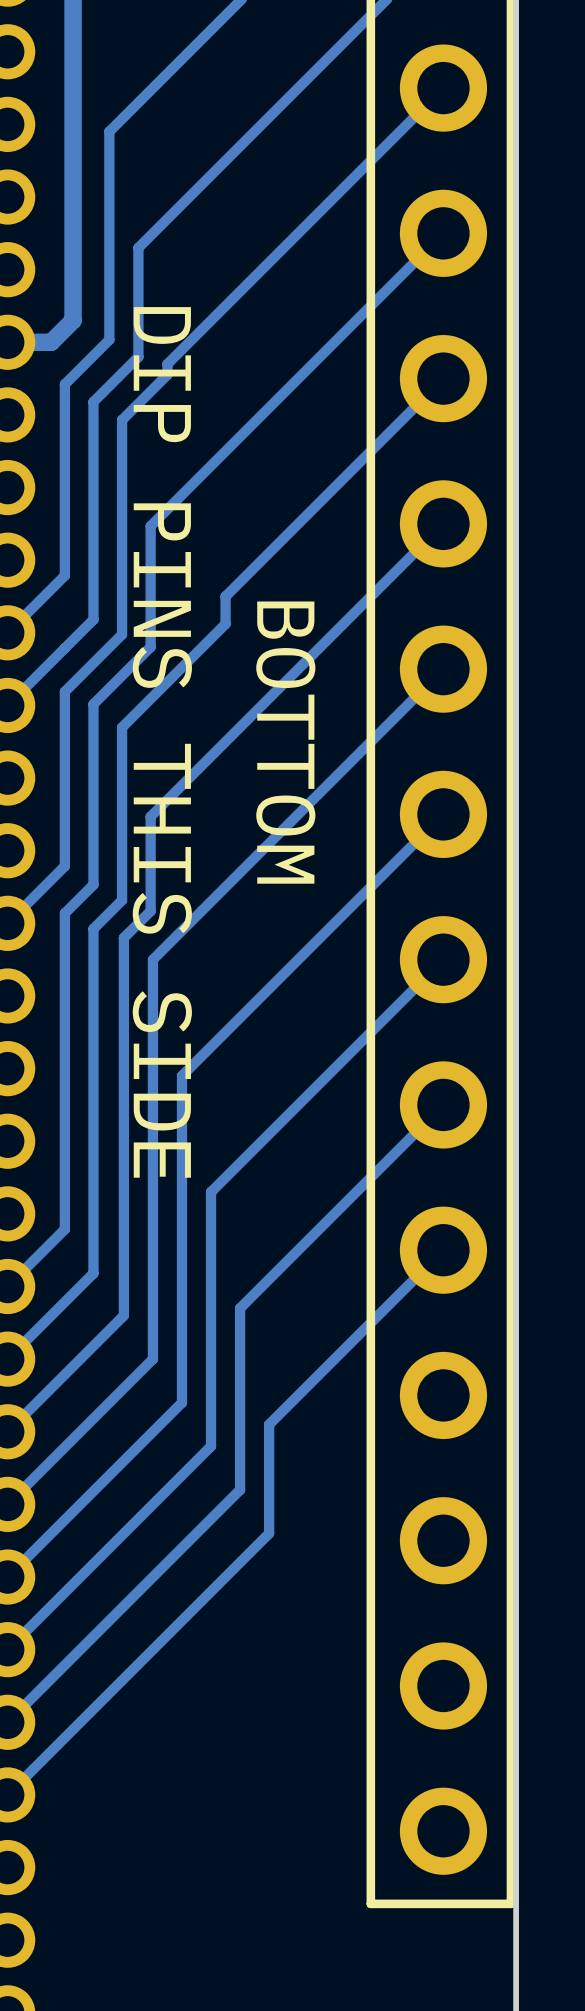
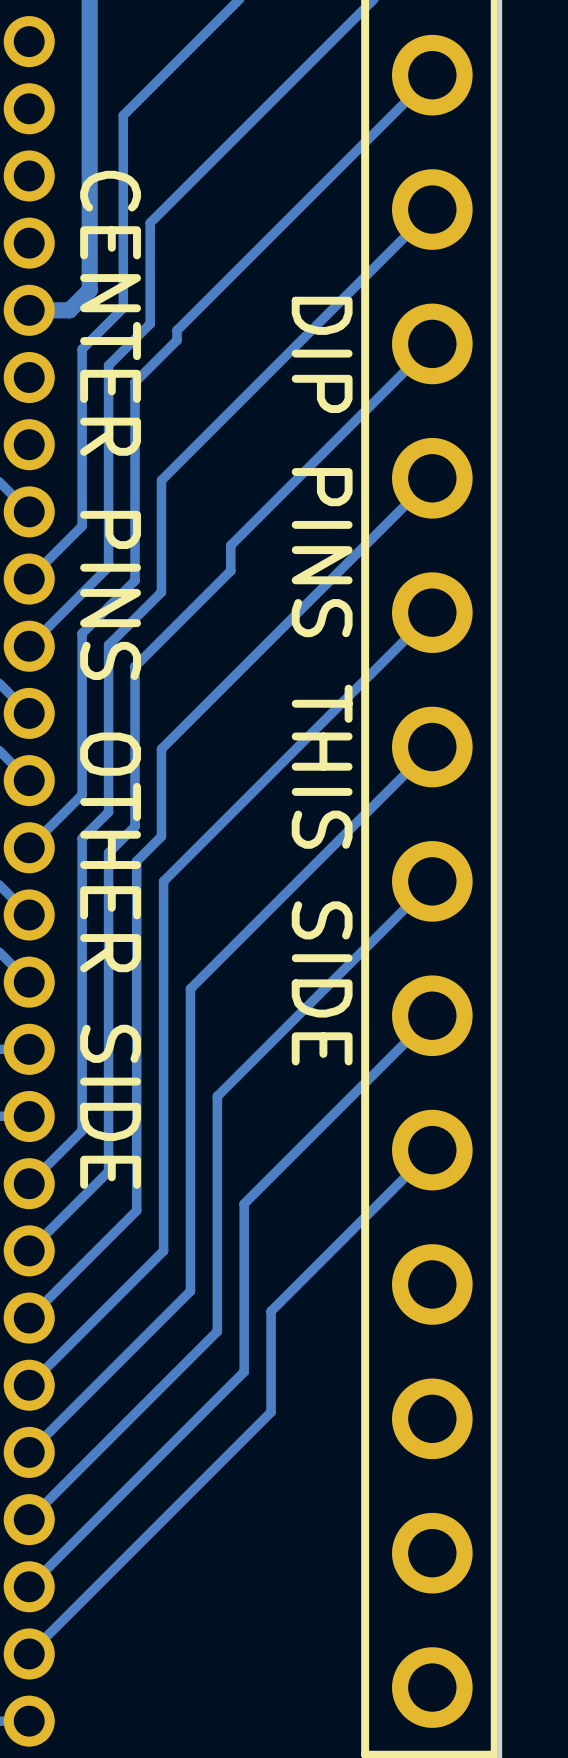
text: none -> CENTER PINS OTHER SIDE (110, 679)
text position: DIP PINS THIS SIDE (162, 742) -> DIP PINS THIS SIDE (322, 681)
text: BOTTOM (285, 742) -> none

